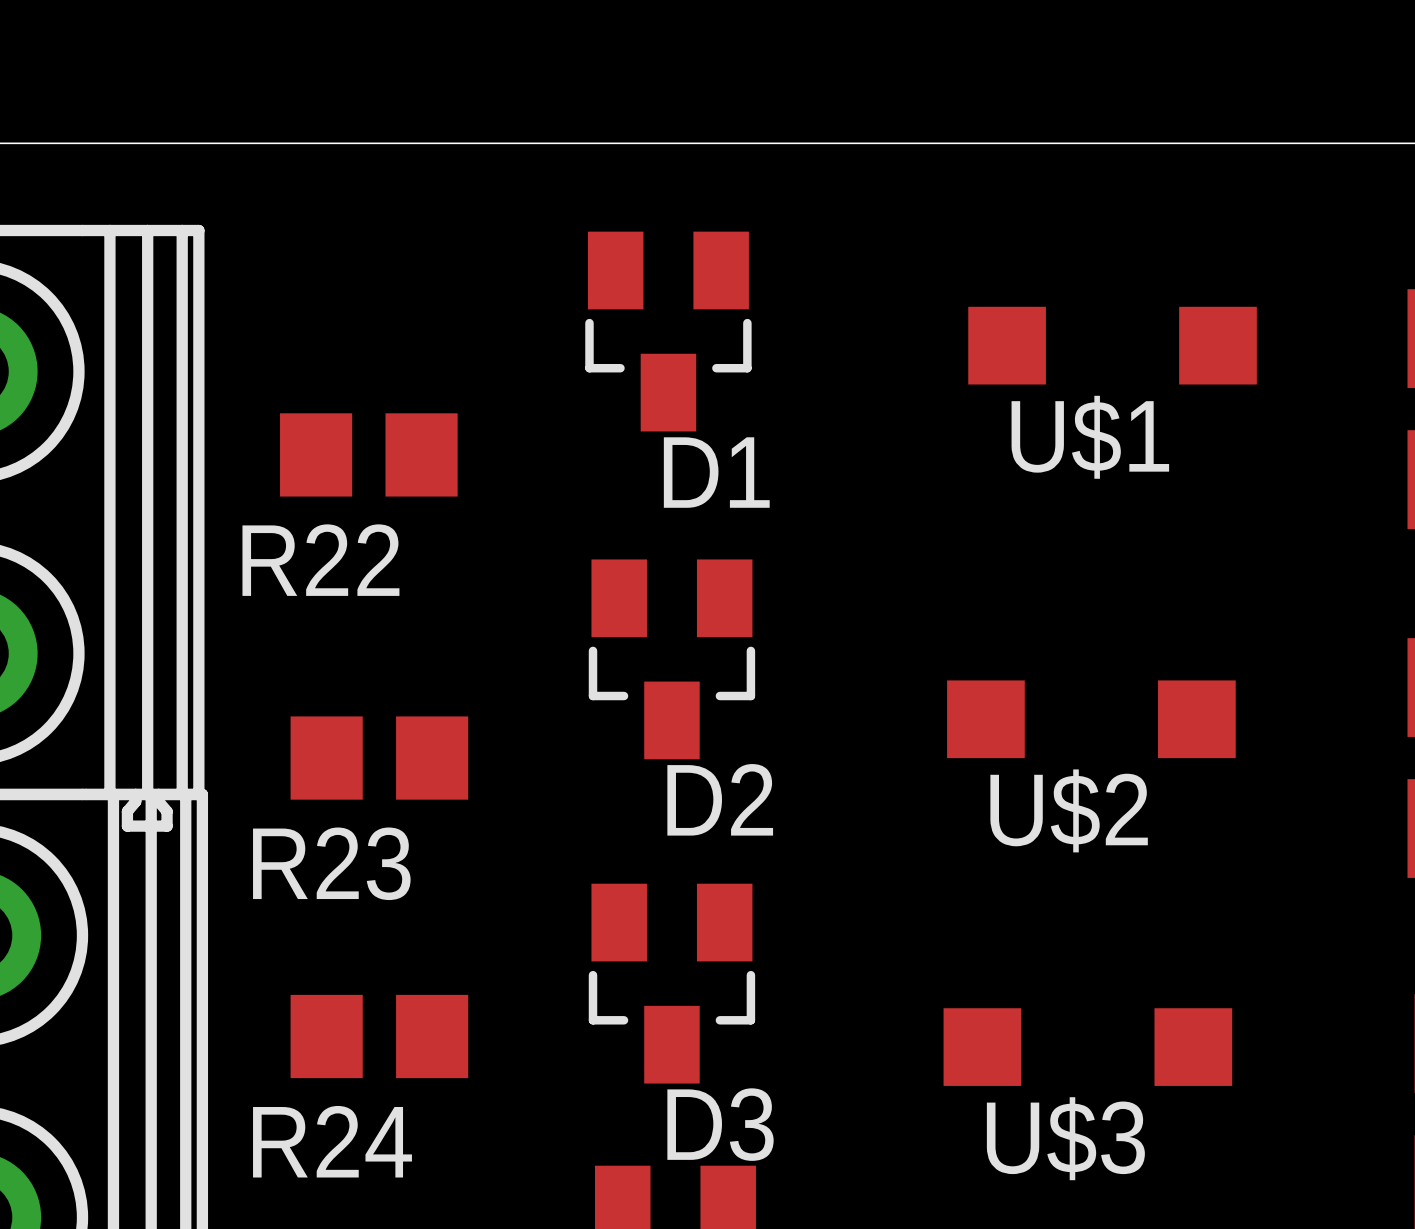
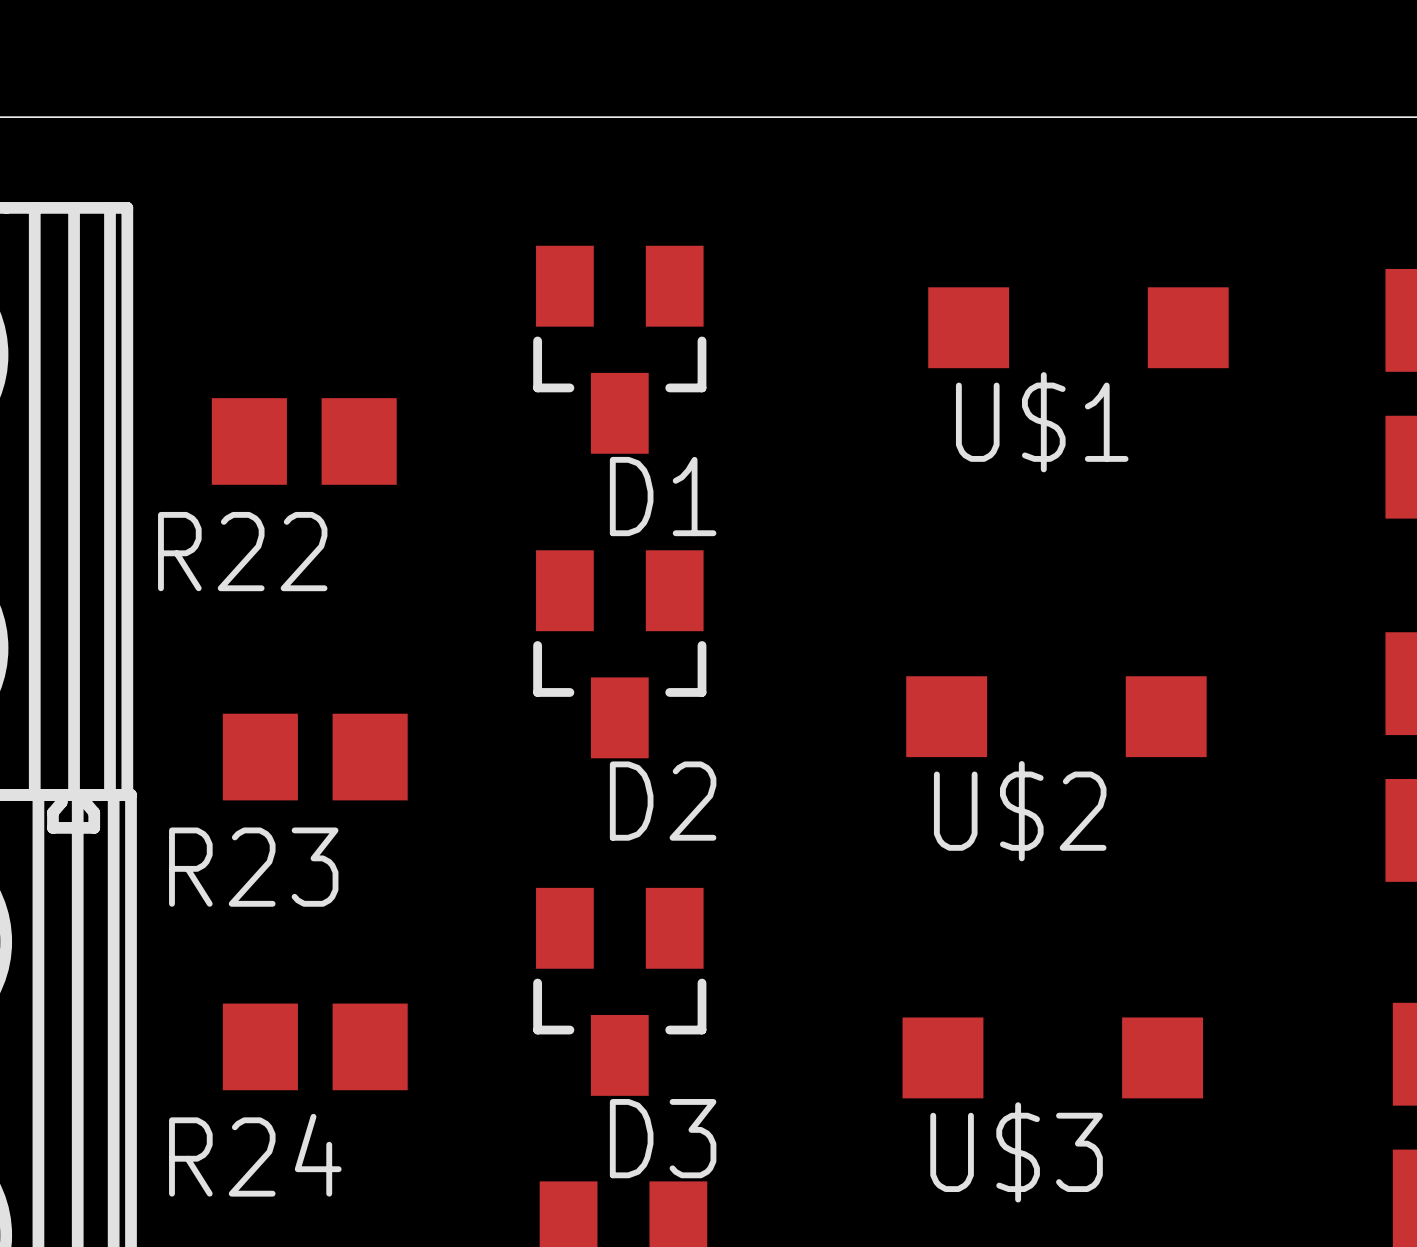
D1 position: (668, 331) -> (619, 349)

